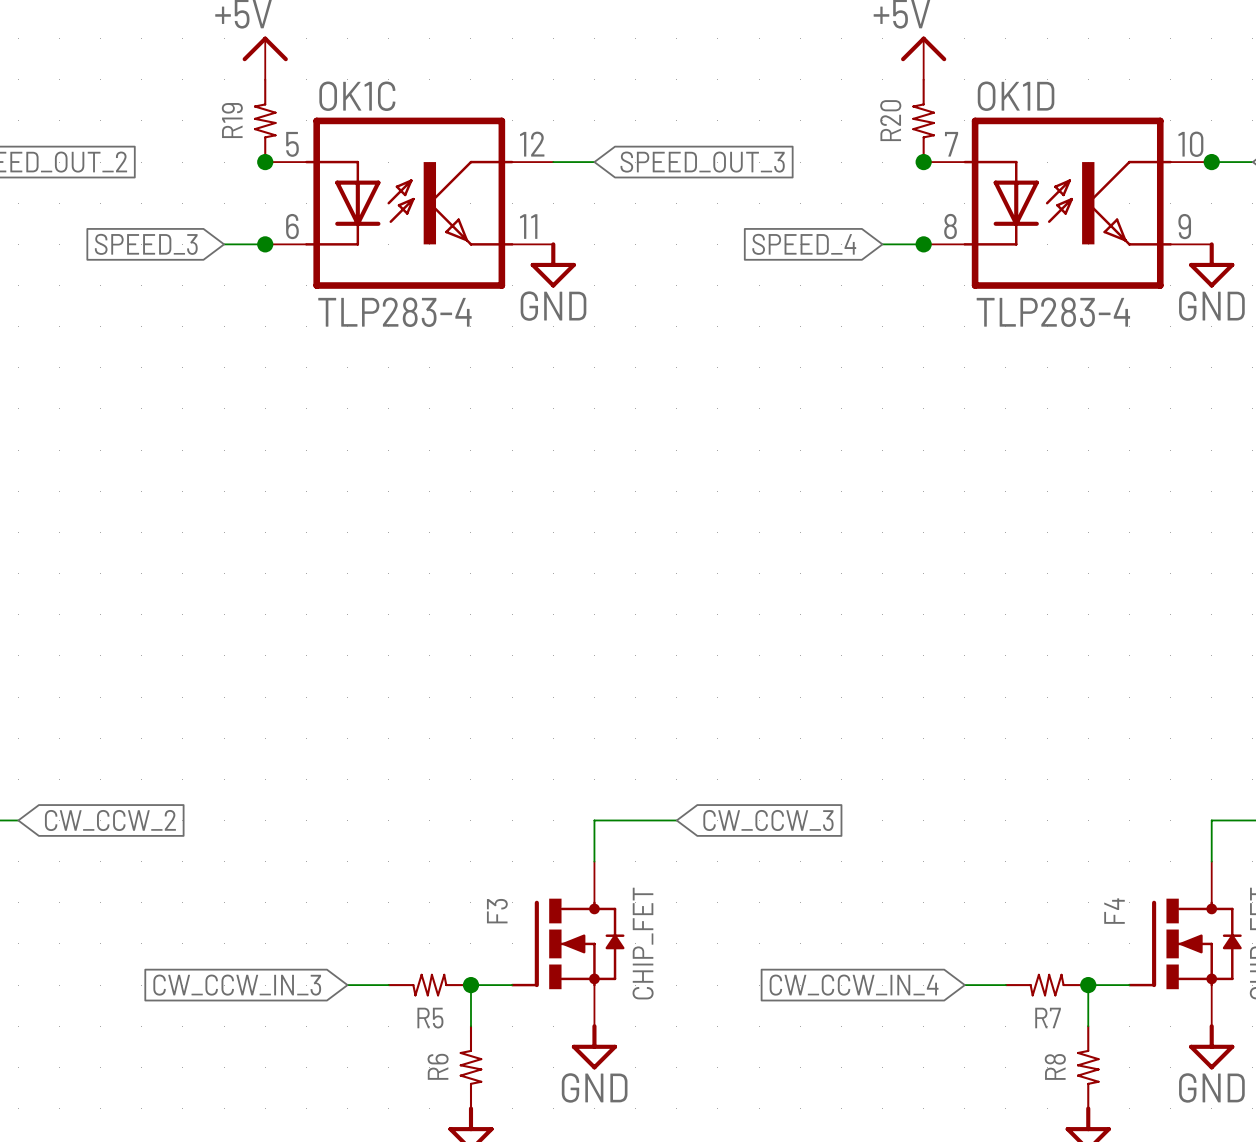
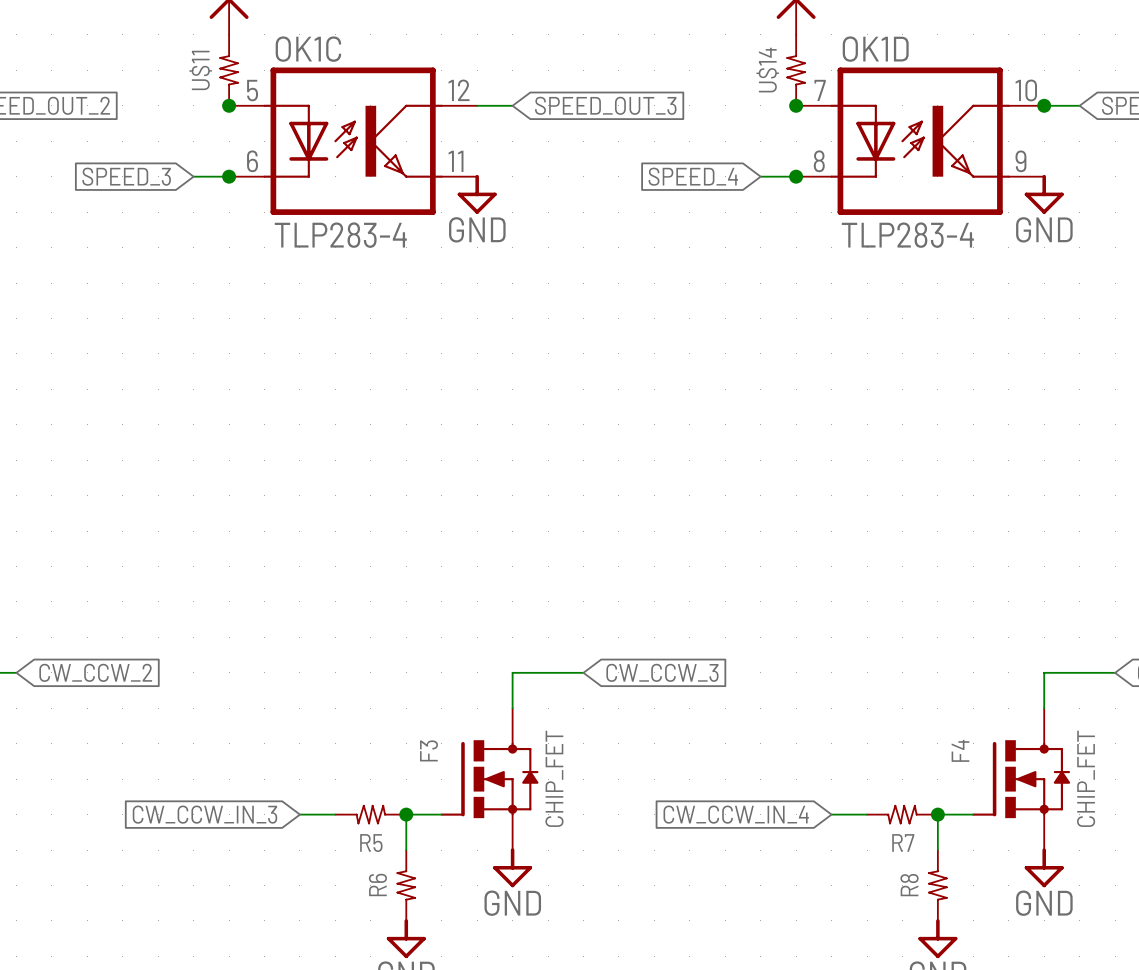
R19 name: R19 (232, 120) -> U$11 (200, 70)
R20 name: R20 (890, 120) -> U$14 (767, 70)

